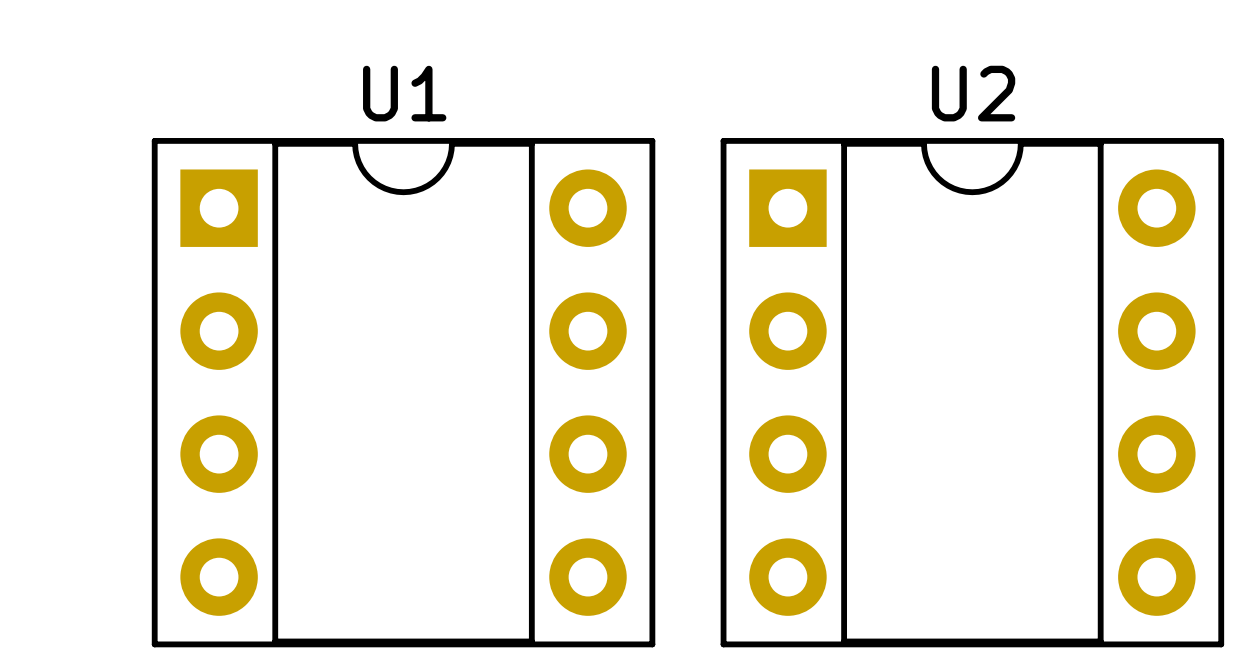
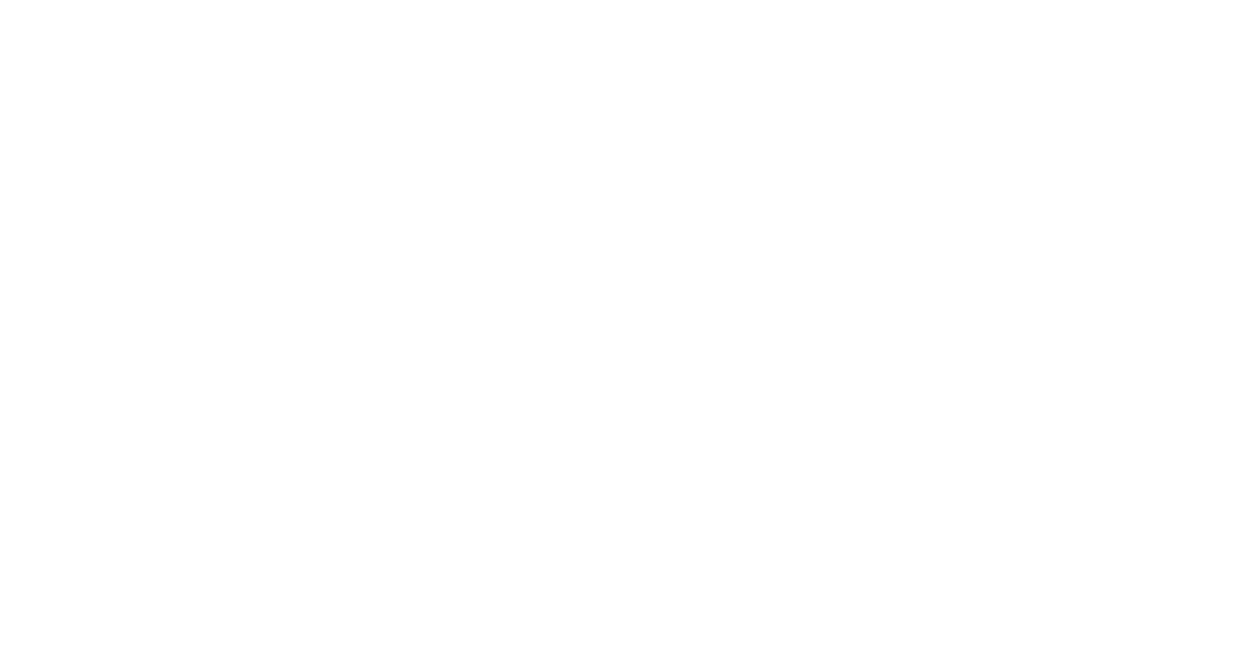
U1: (403, 392) -> none
U2: (972, 392) -> none

